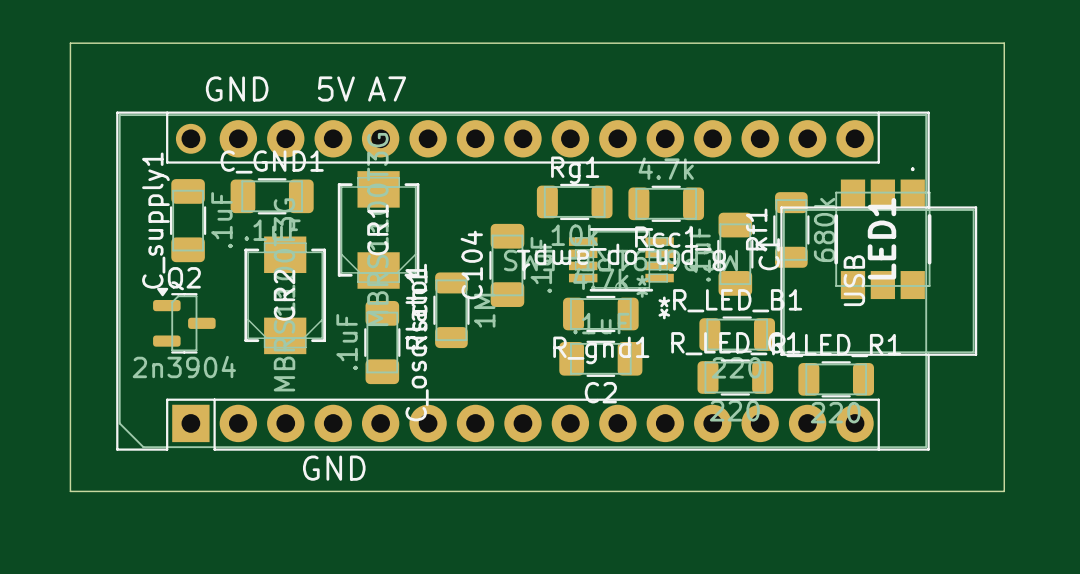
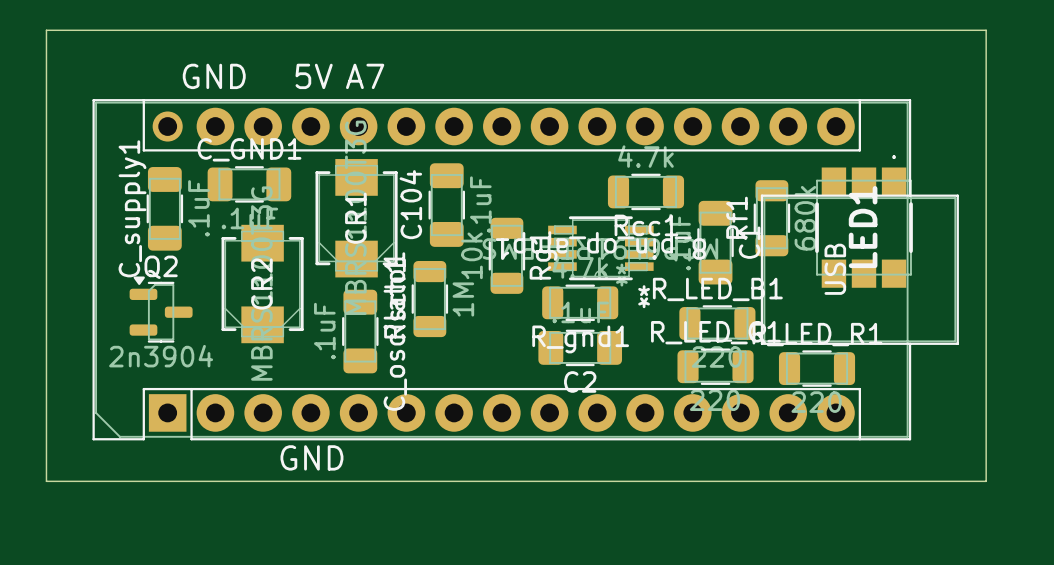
Rg1 rotation: 0° (574, 201) -> 90° clockwise (506, 255)
Rg1 position: (574, 201) -> (506, 255)
C104 position: (507, 265) -> (446, 205)

